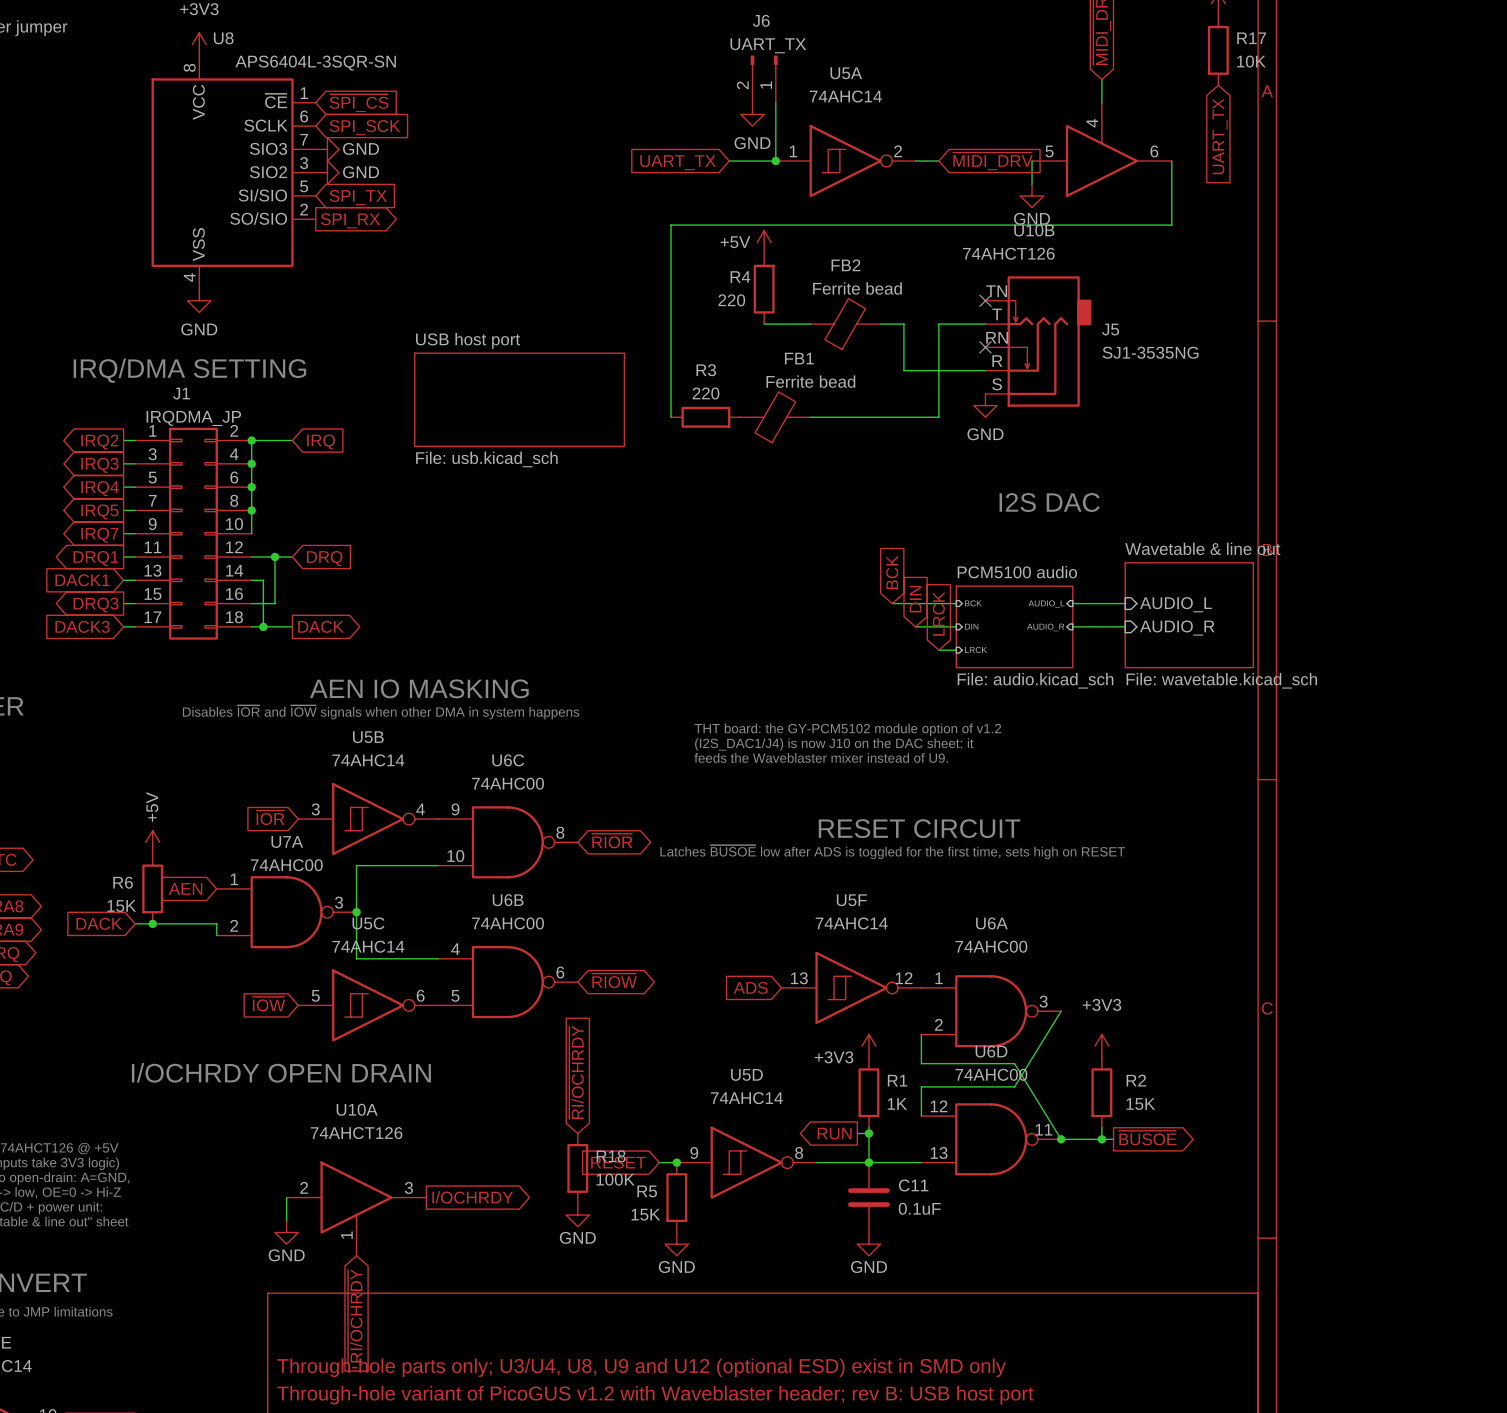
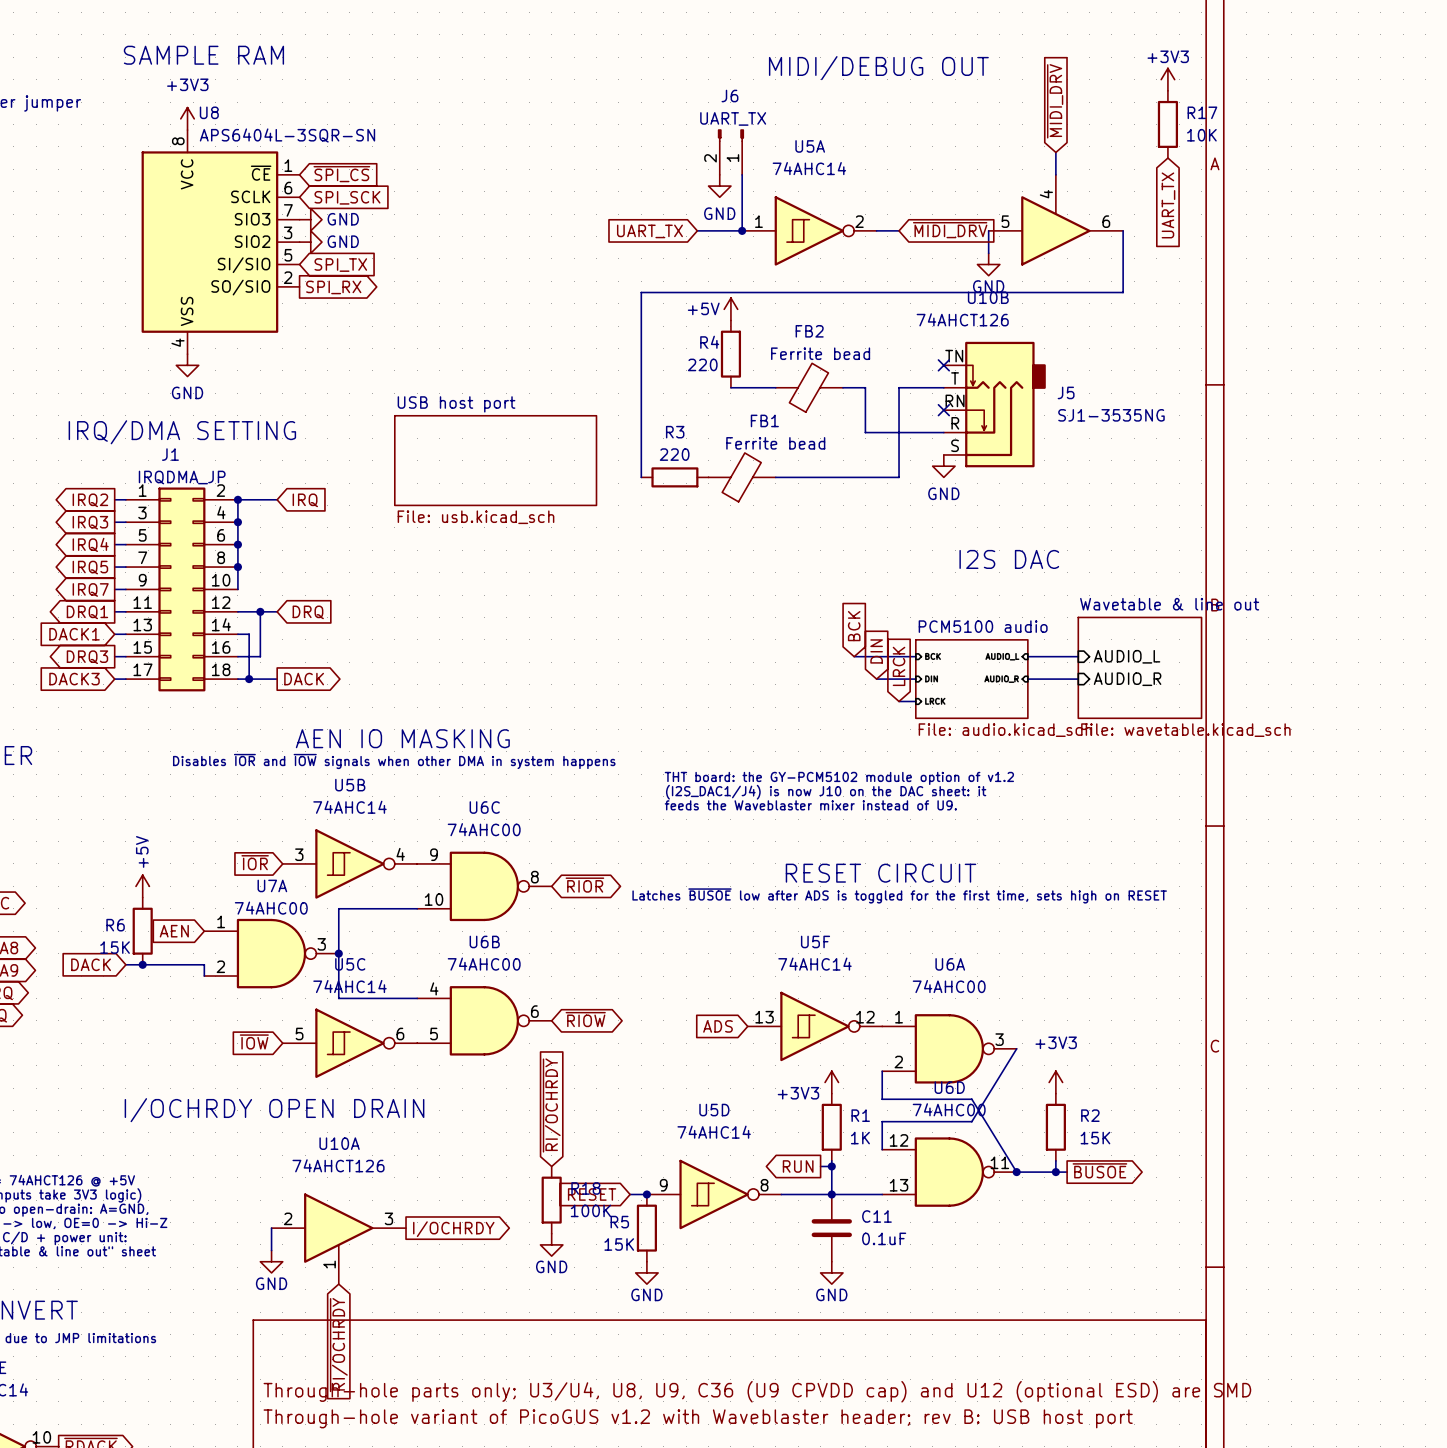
title block: Through-hole parts only; U3/U4, U8, U9 and U12 (optional ESD) exist in SMD only (641, 1367) -> Through-hole parts only; U3/U4, U8, U9, C36 (U9 CPVDD cap) and U12 (optional ESD) are SMD (757, 1391)

